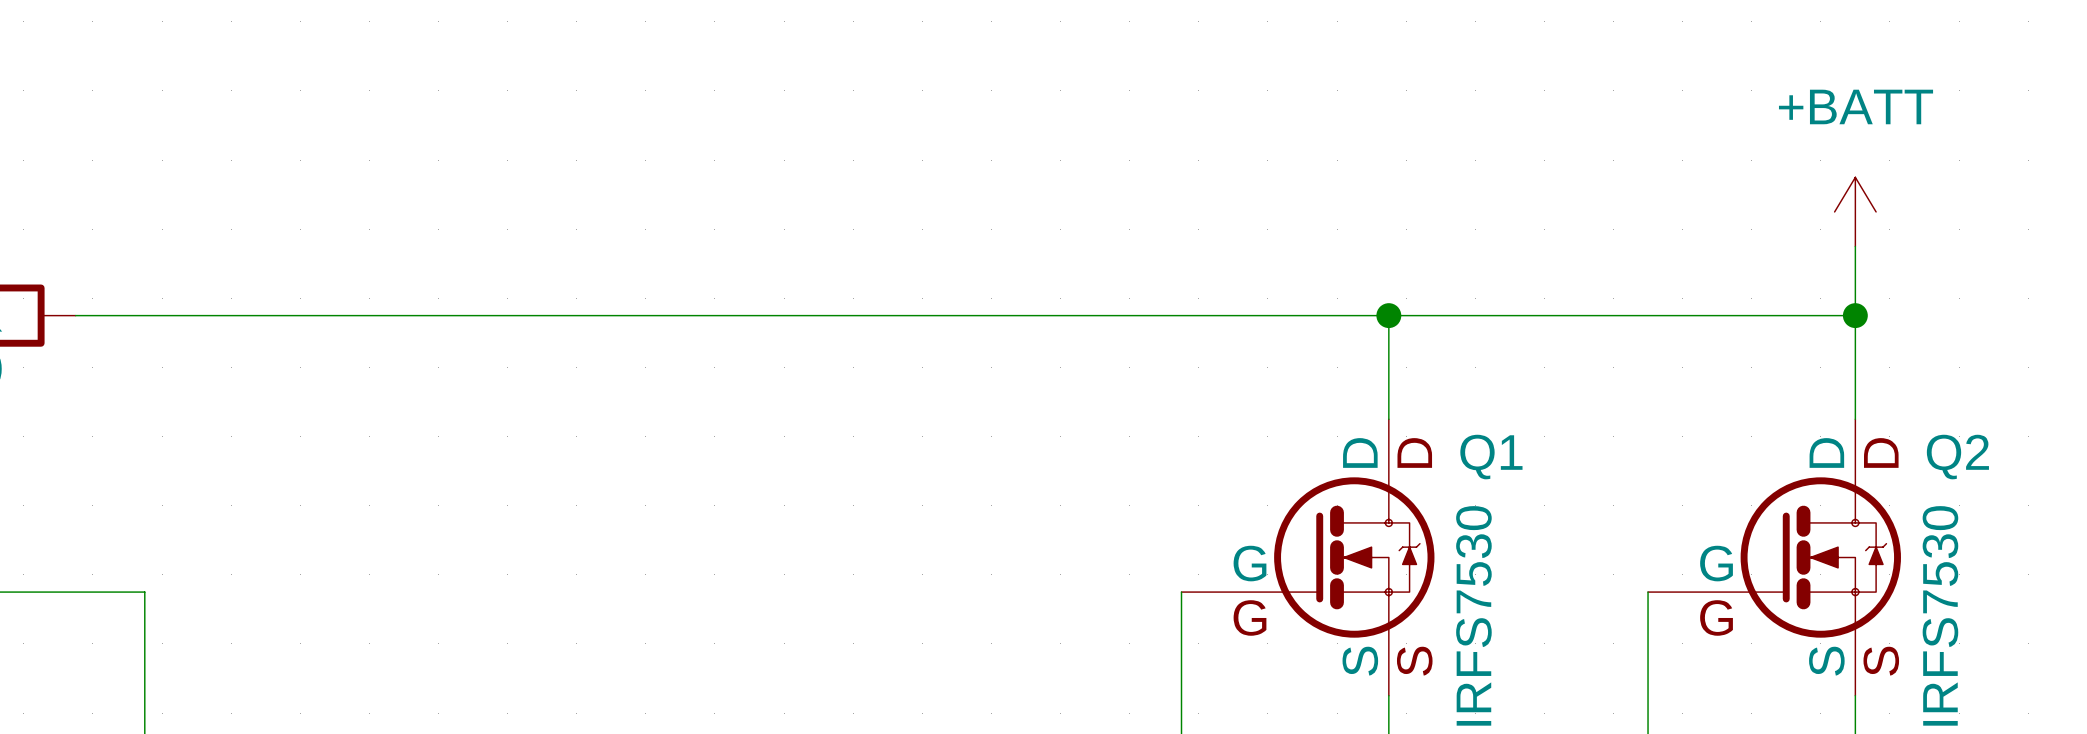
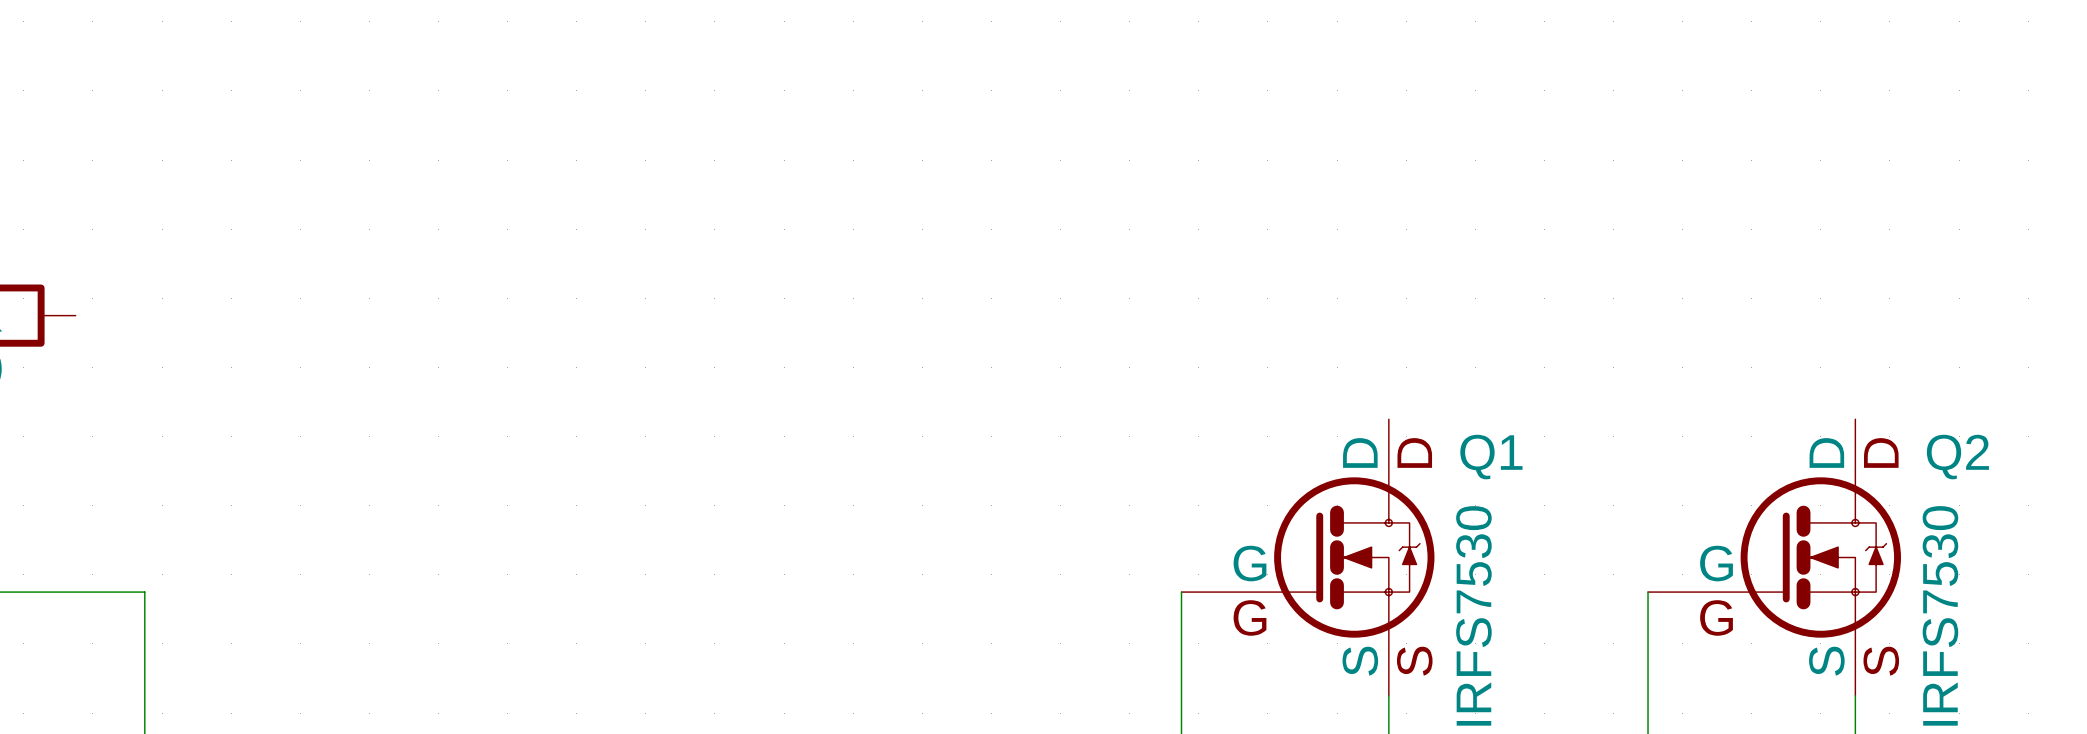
power symbol: +BATT (1855, 211) -> none
wire: (1855, 246) (1855, 419) -> none
wire: (75, 315) (1855, 315) -> none
wire: (1388, 315) (1388, 419) -> none
junction: (1388, 315) -> none
junction: (1855, 315) -> none

